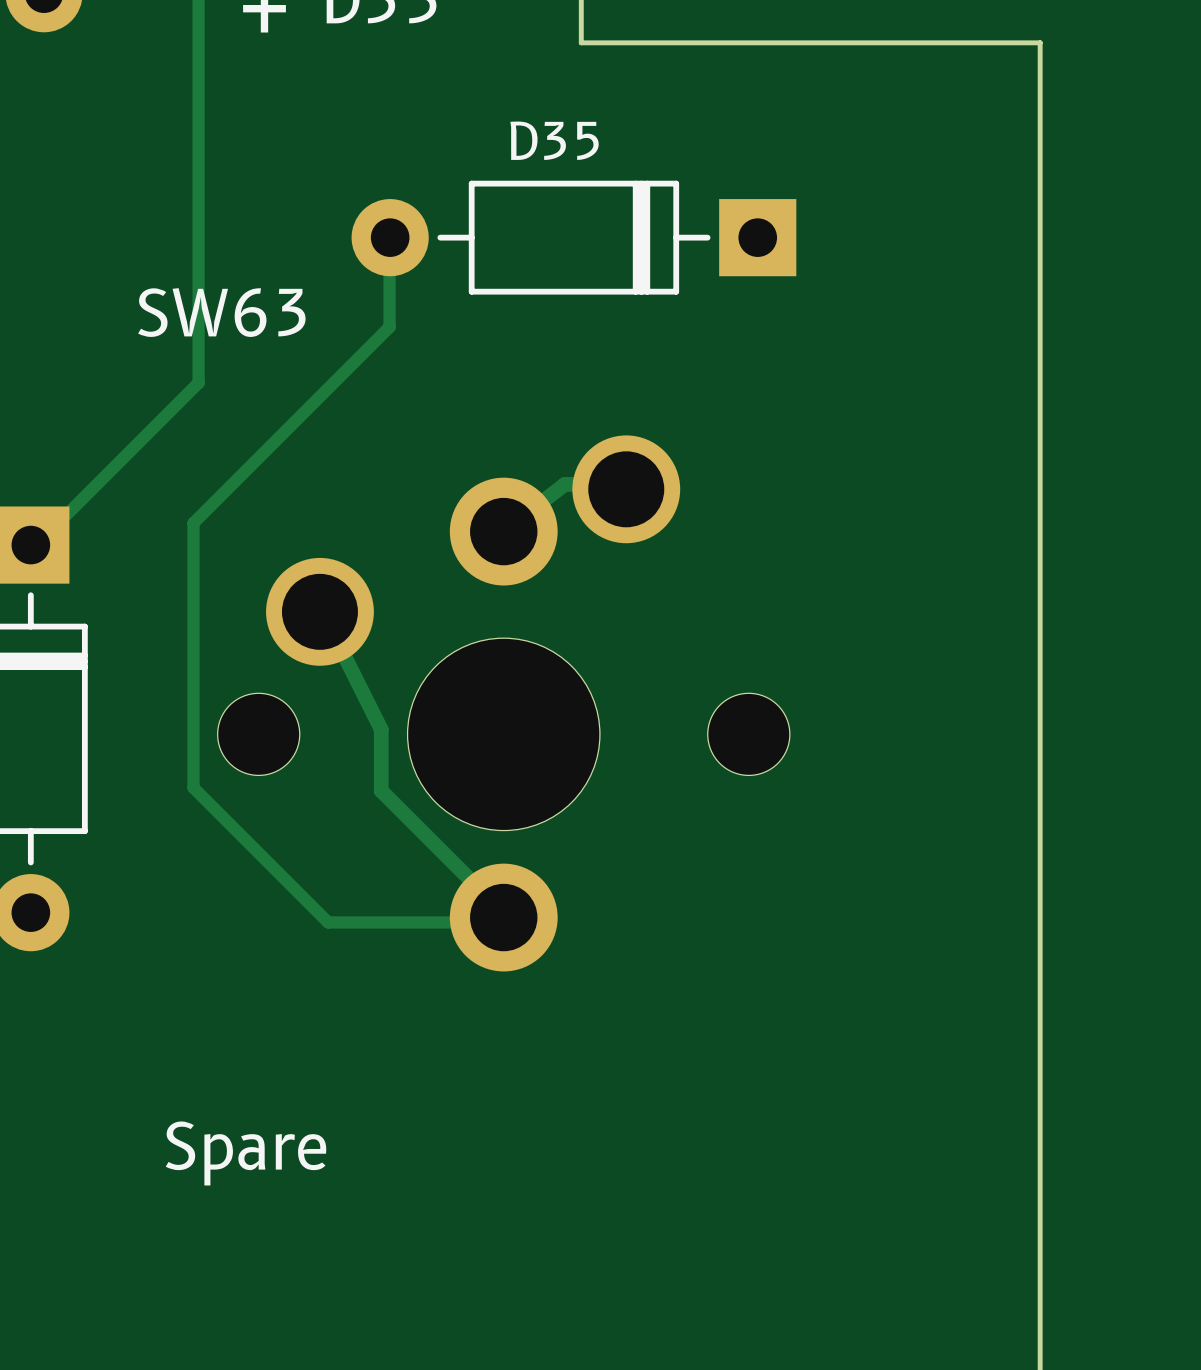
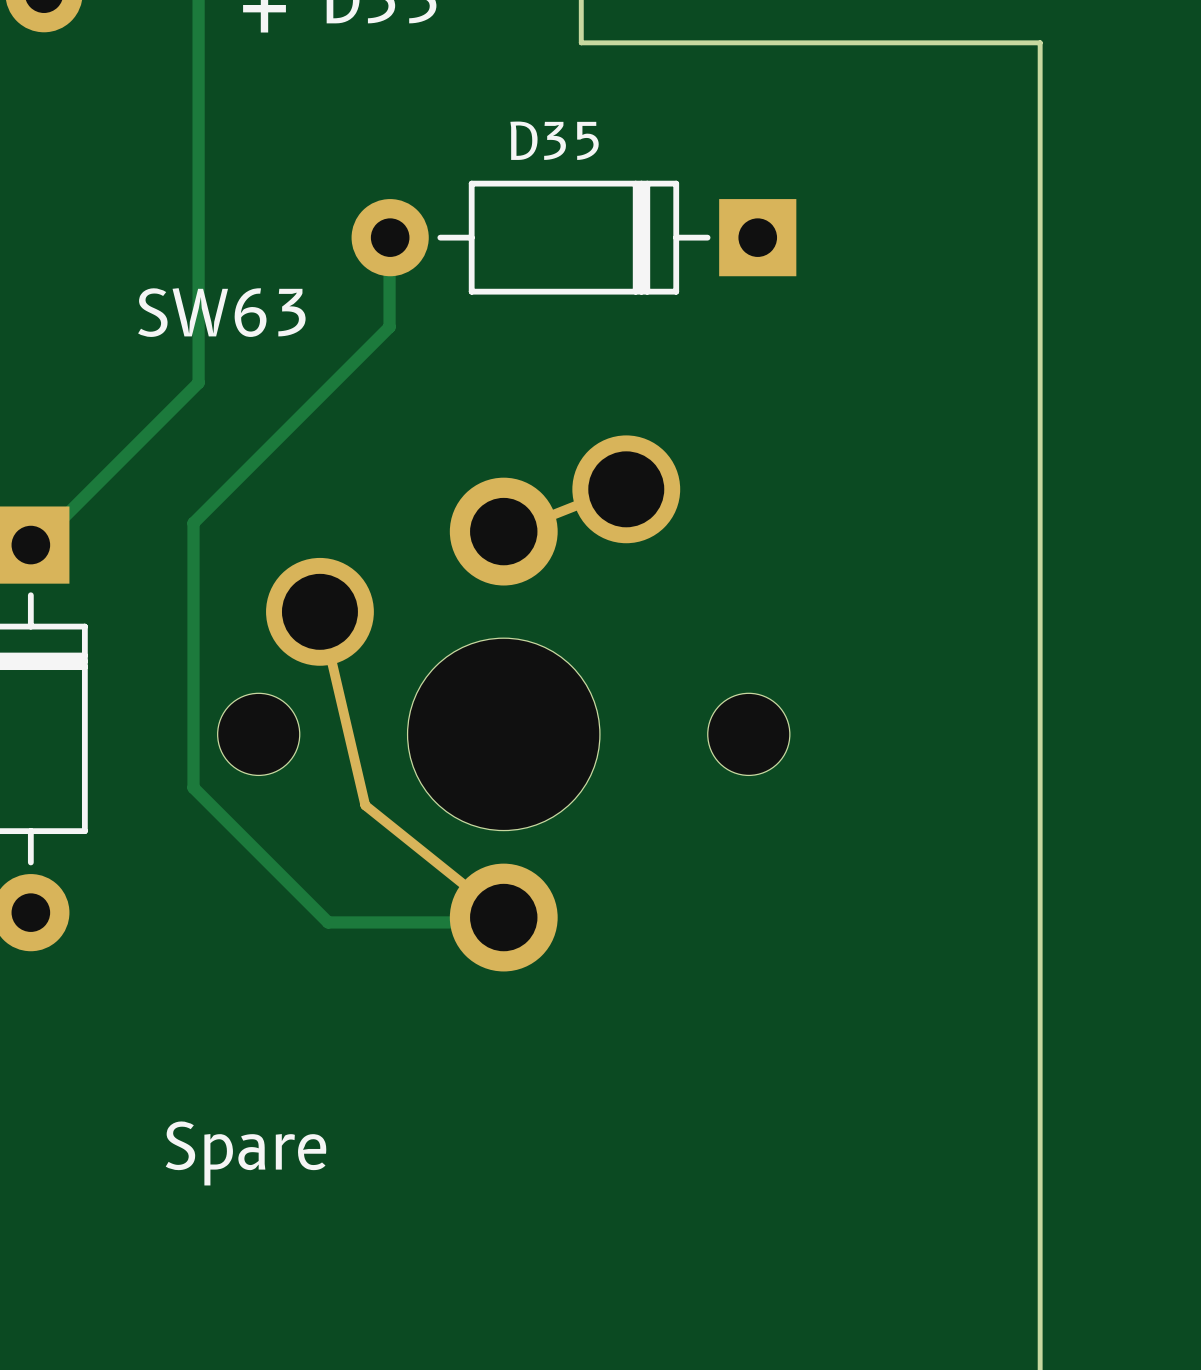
SW63 footprint: [217, 435, 790, 972] -> [217, 435, 790, 972]

